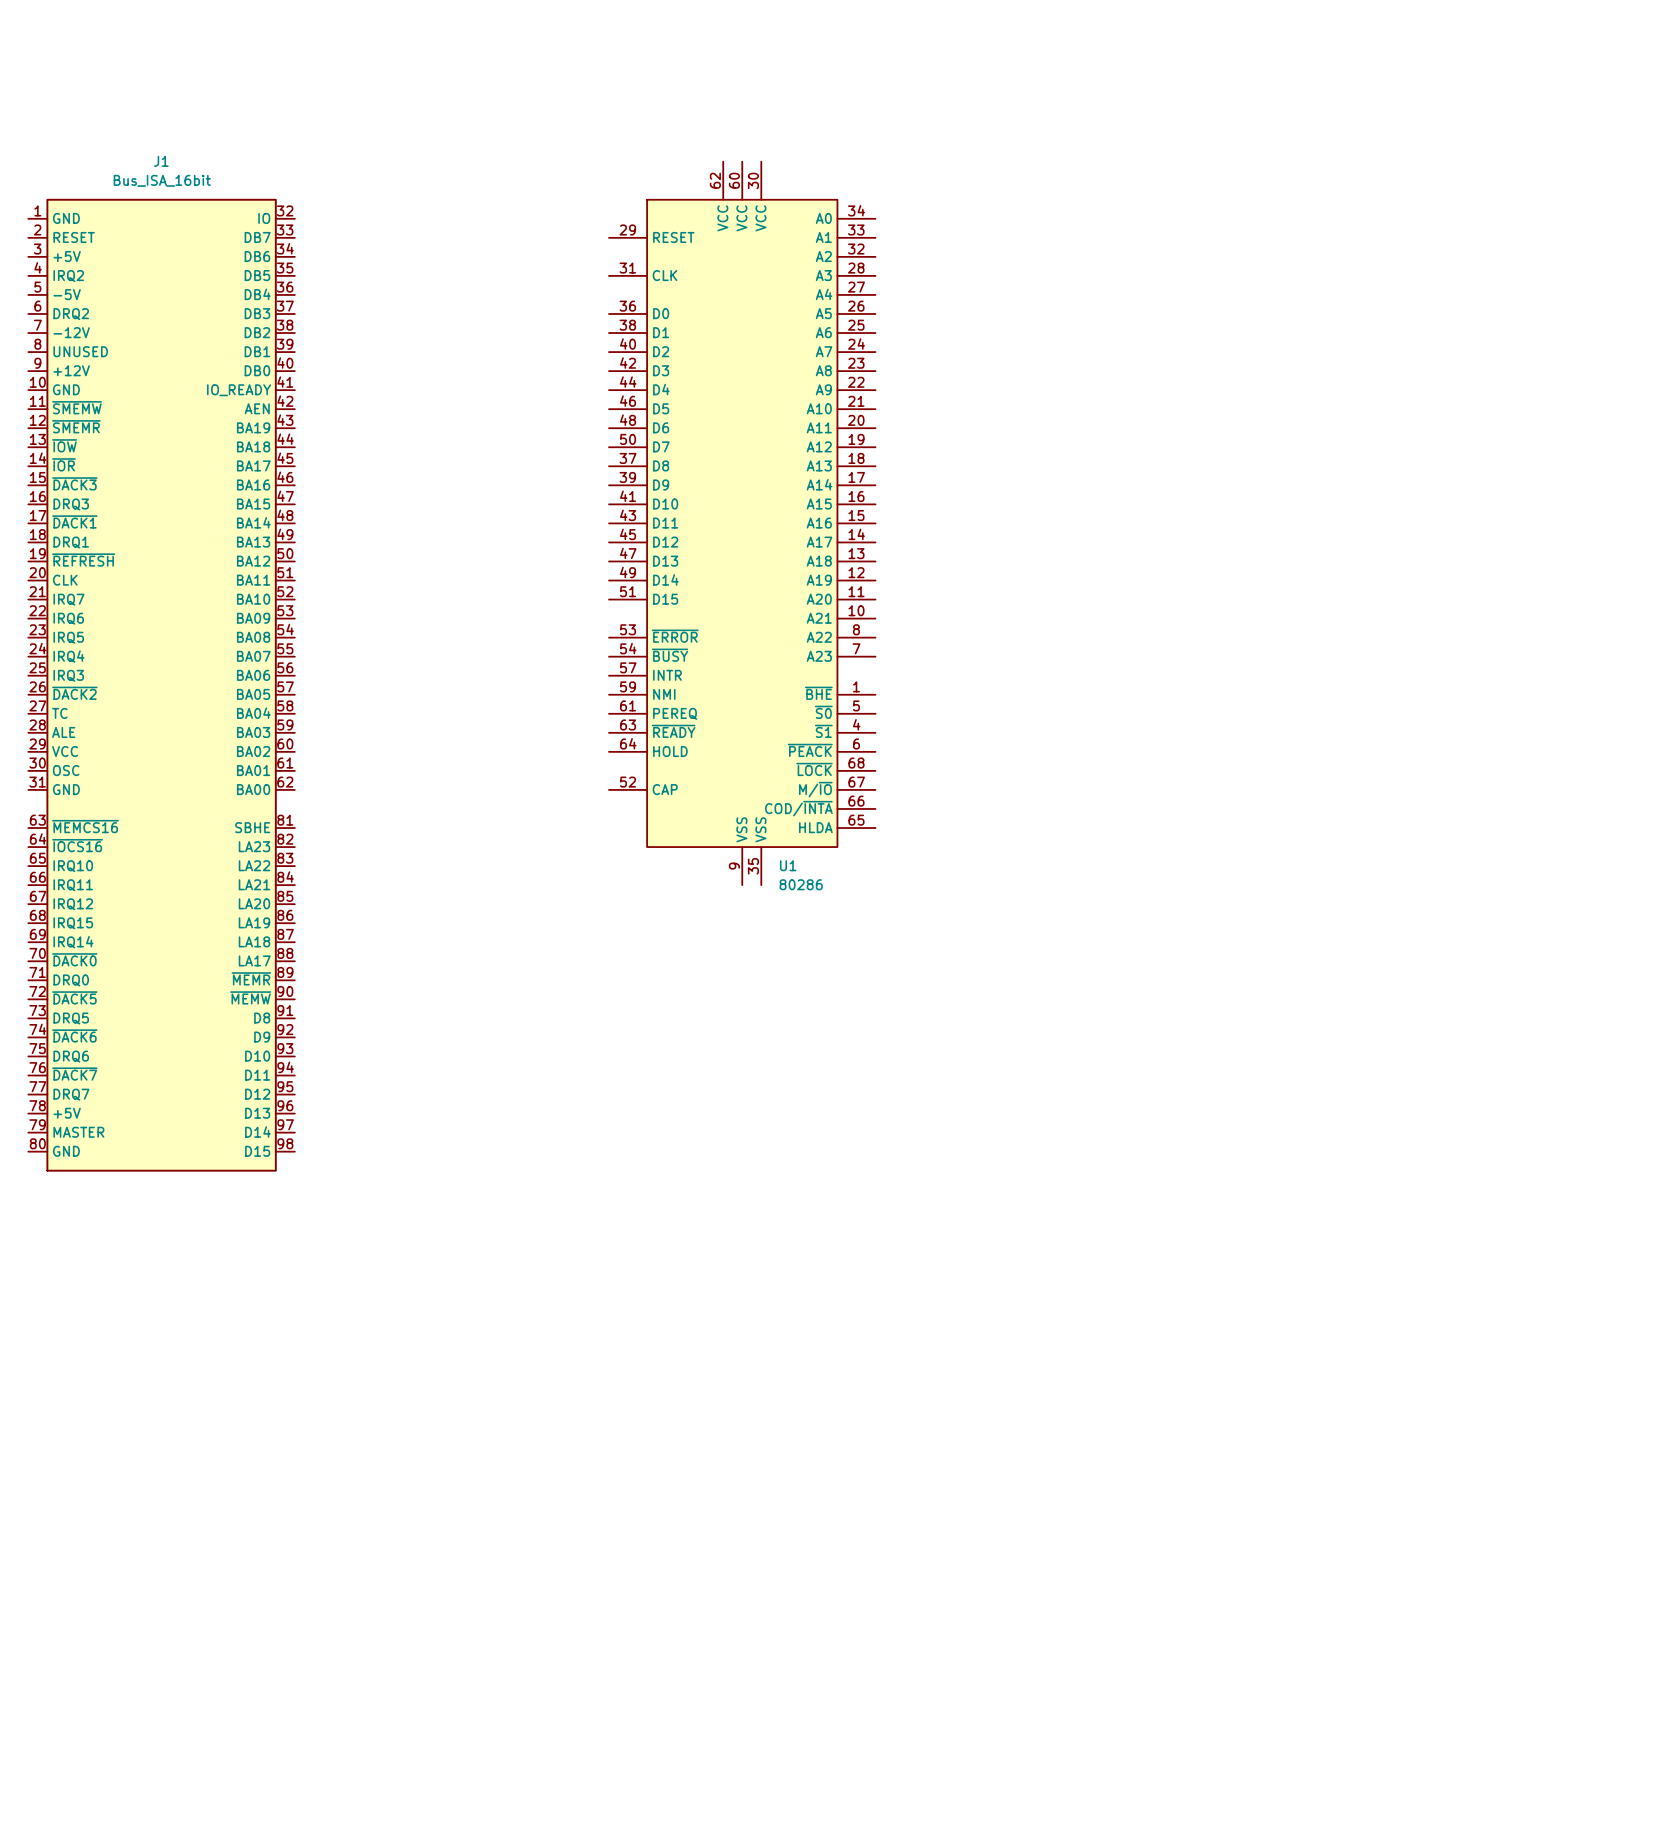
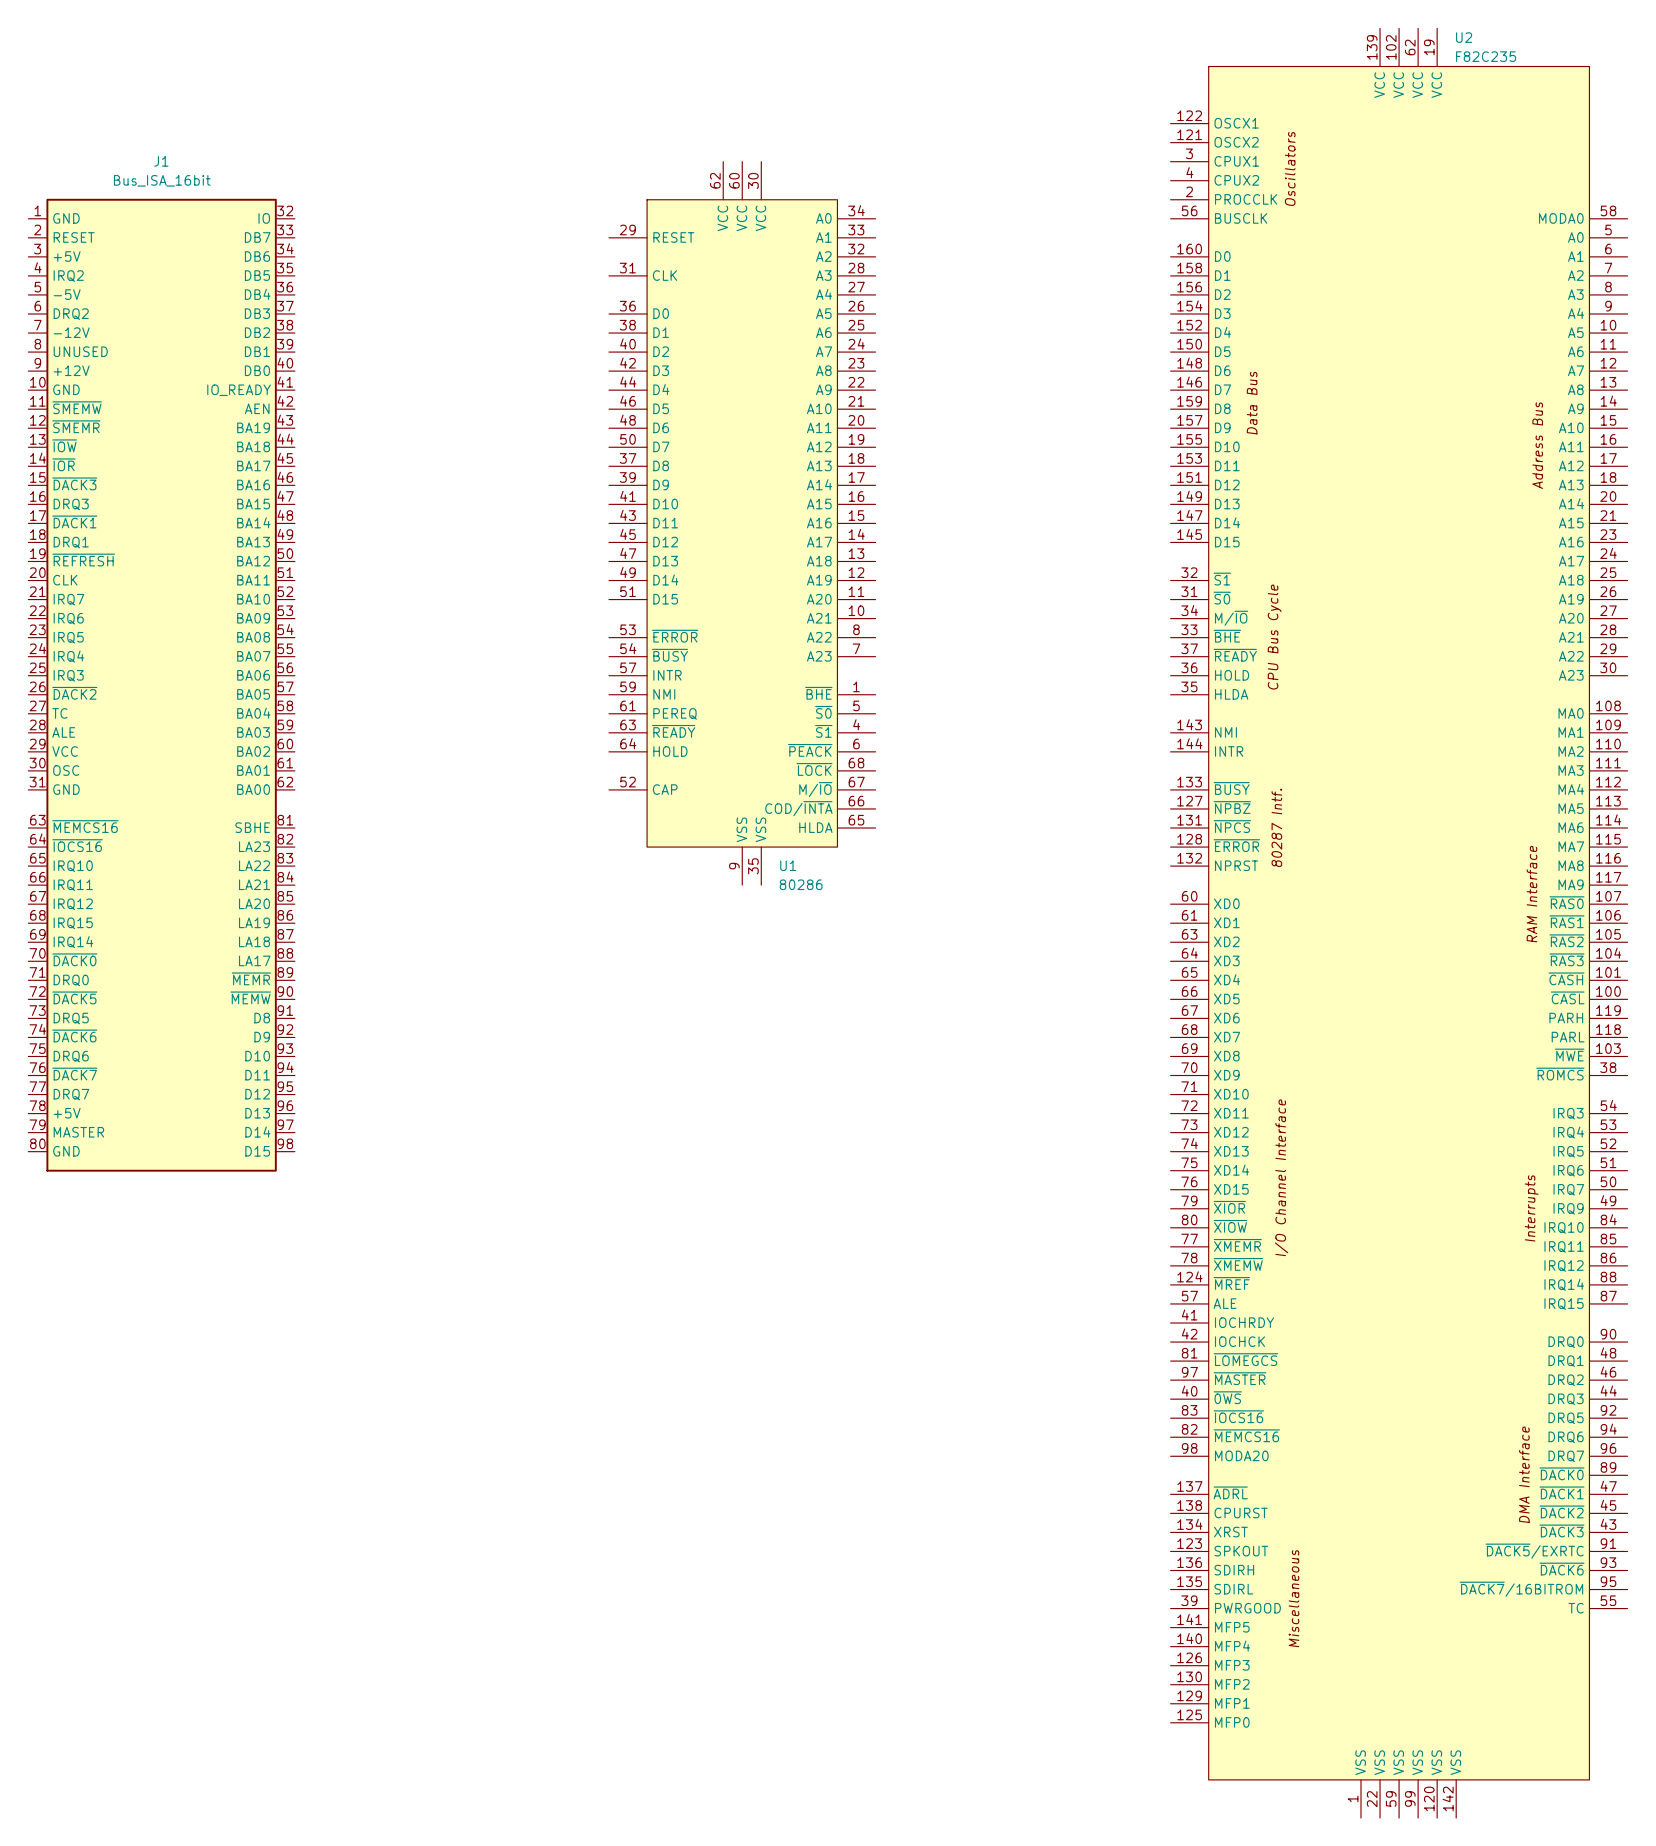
U2: none -> F82C235 (1399, 923)

